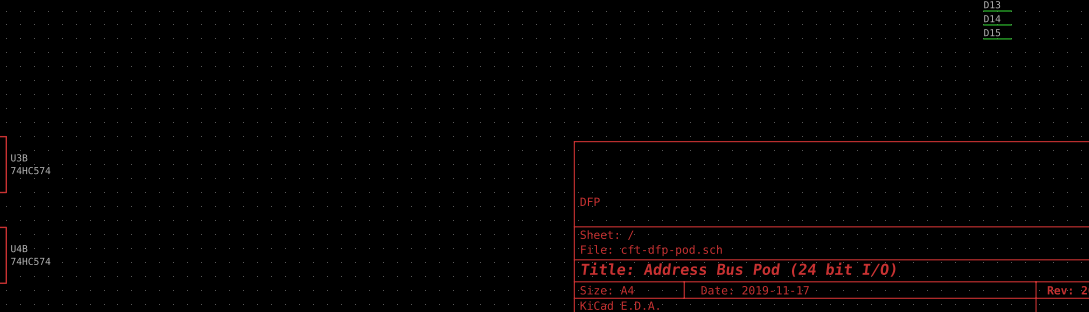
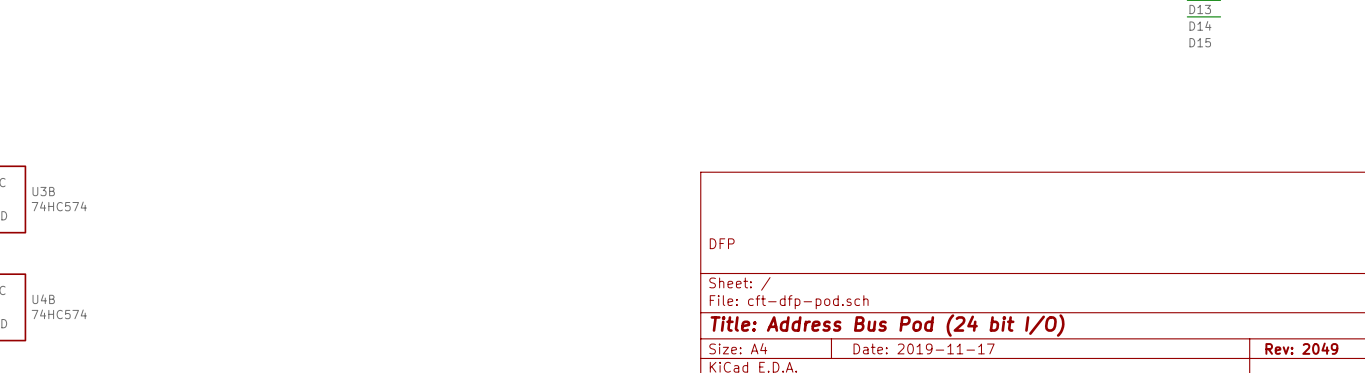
wire: (983, 24) (1011, 24) -> none
wire: (983, 38) (1011, 38) -> none

